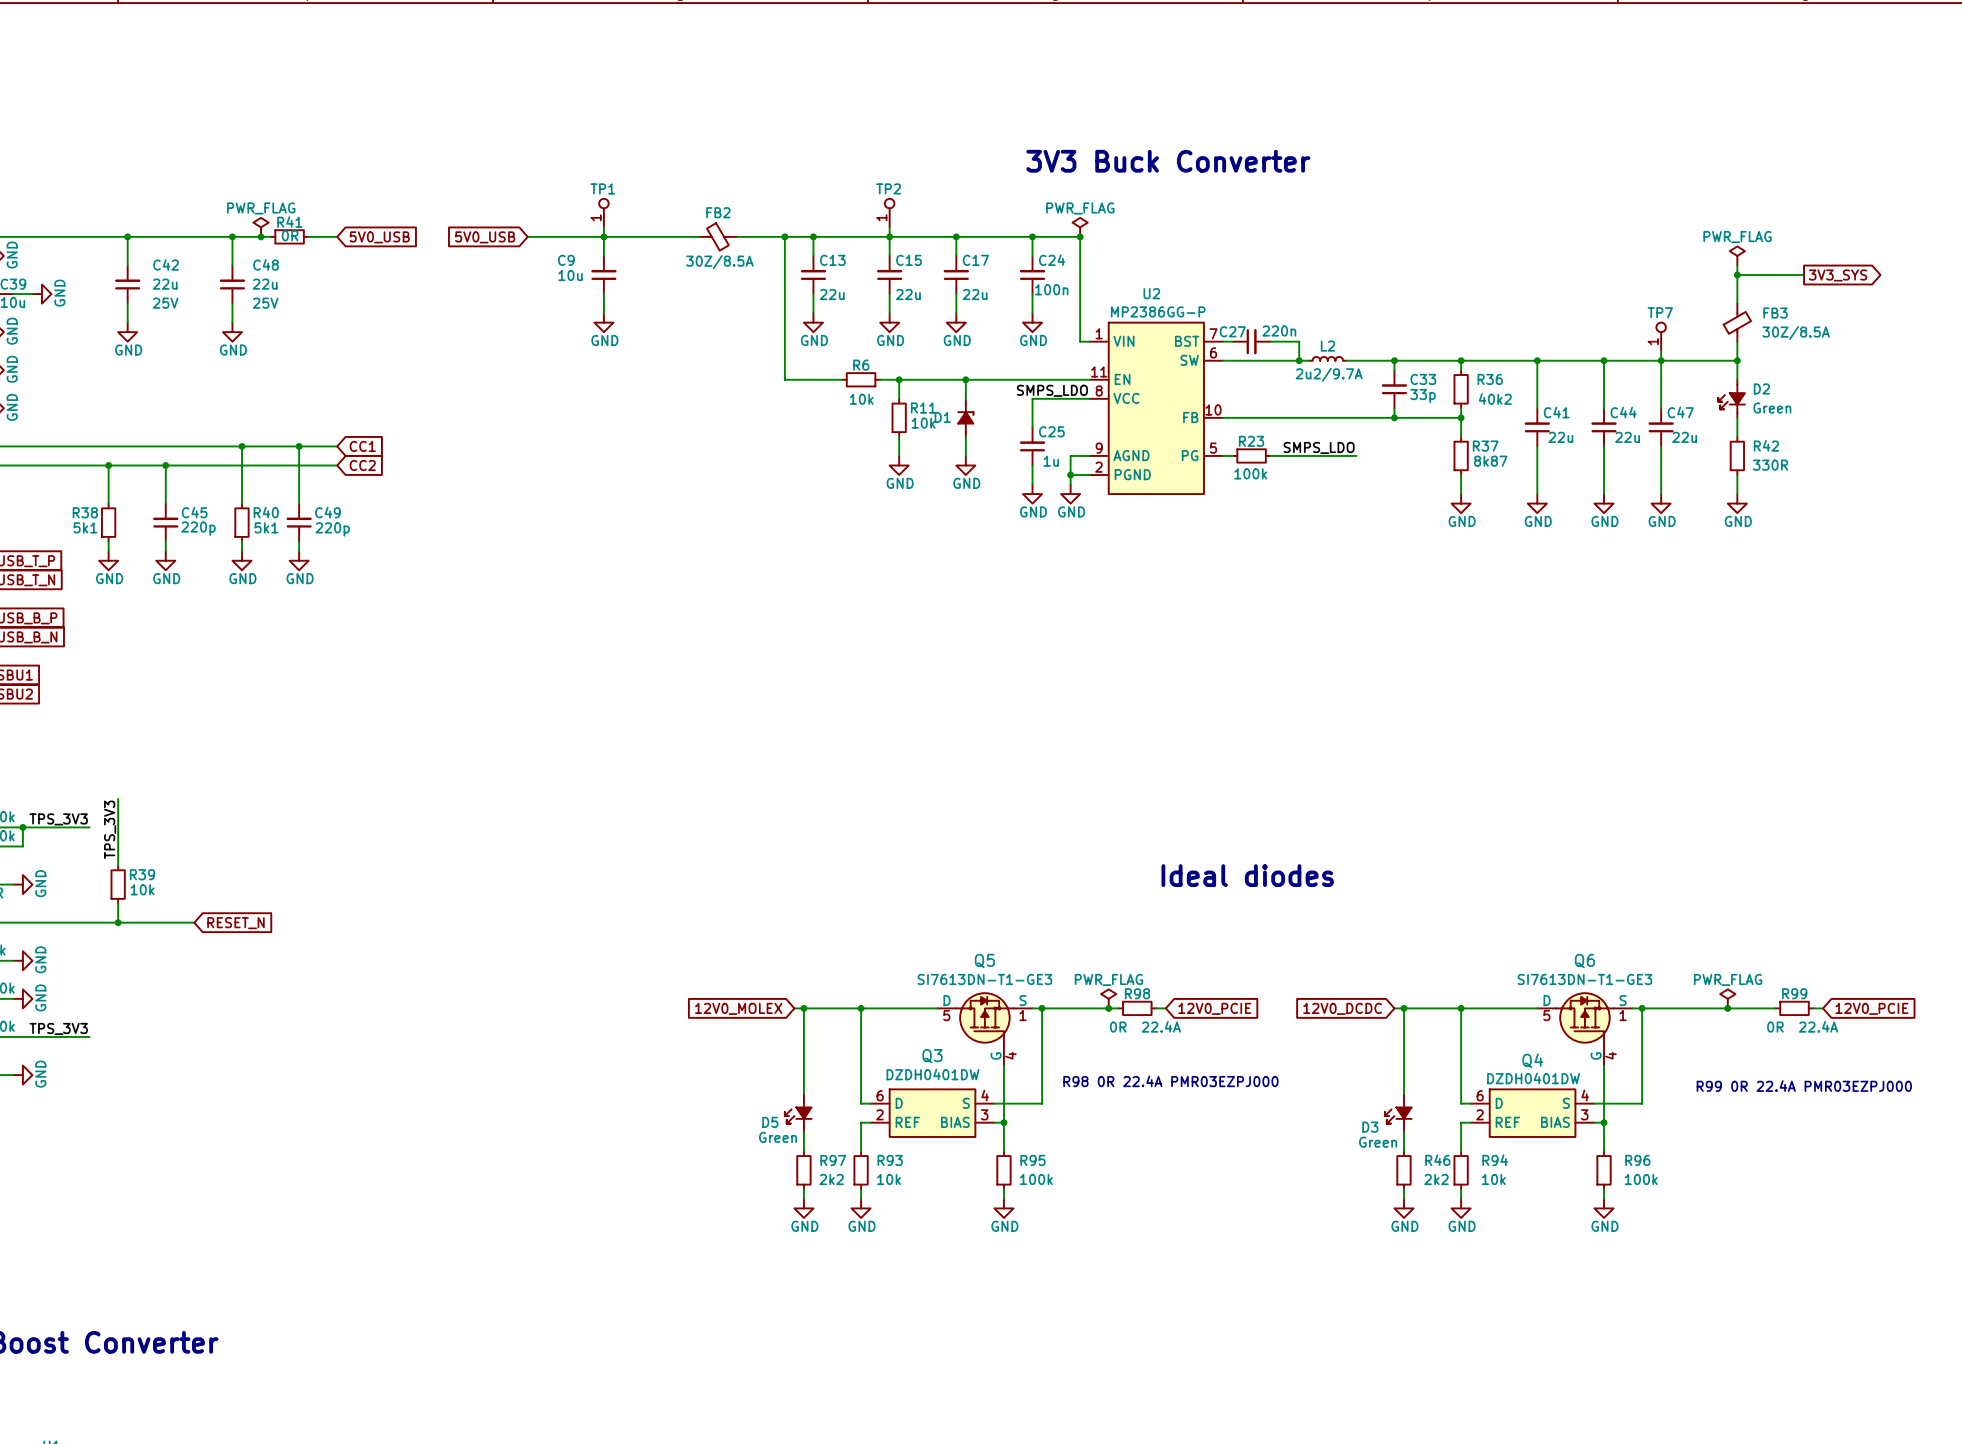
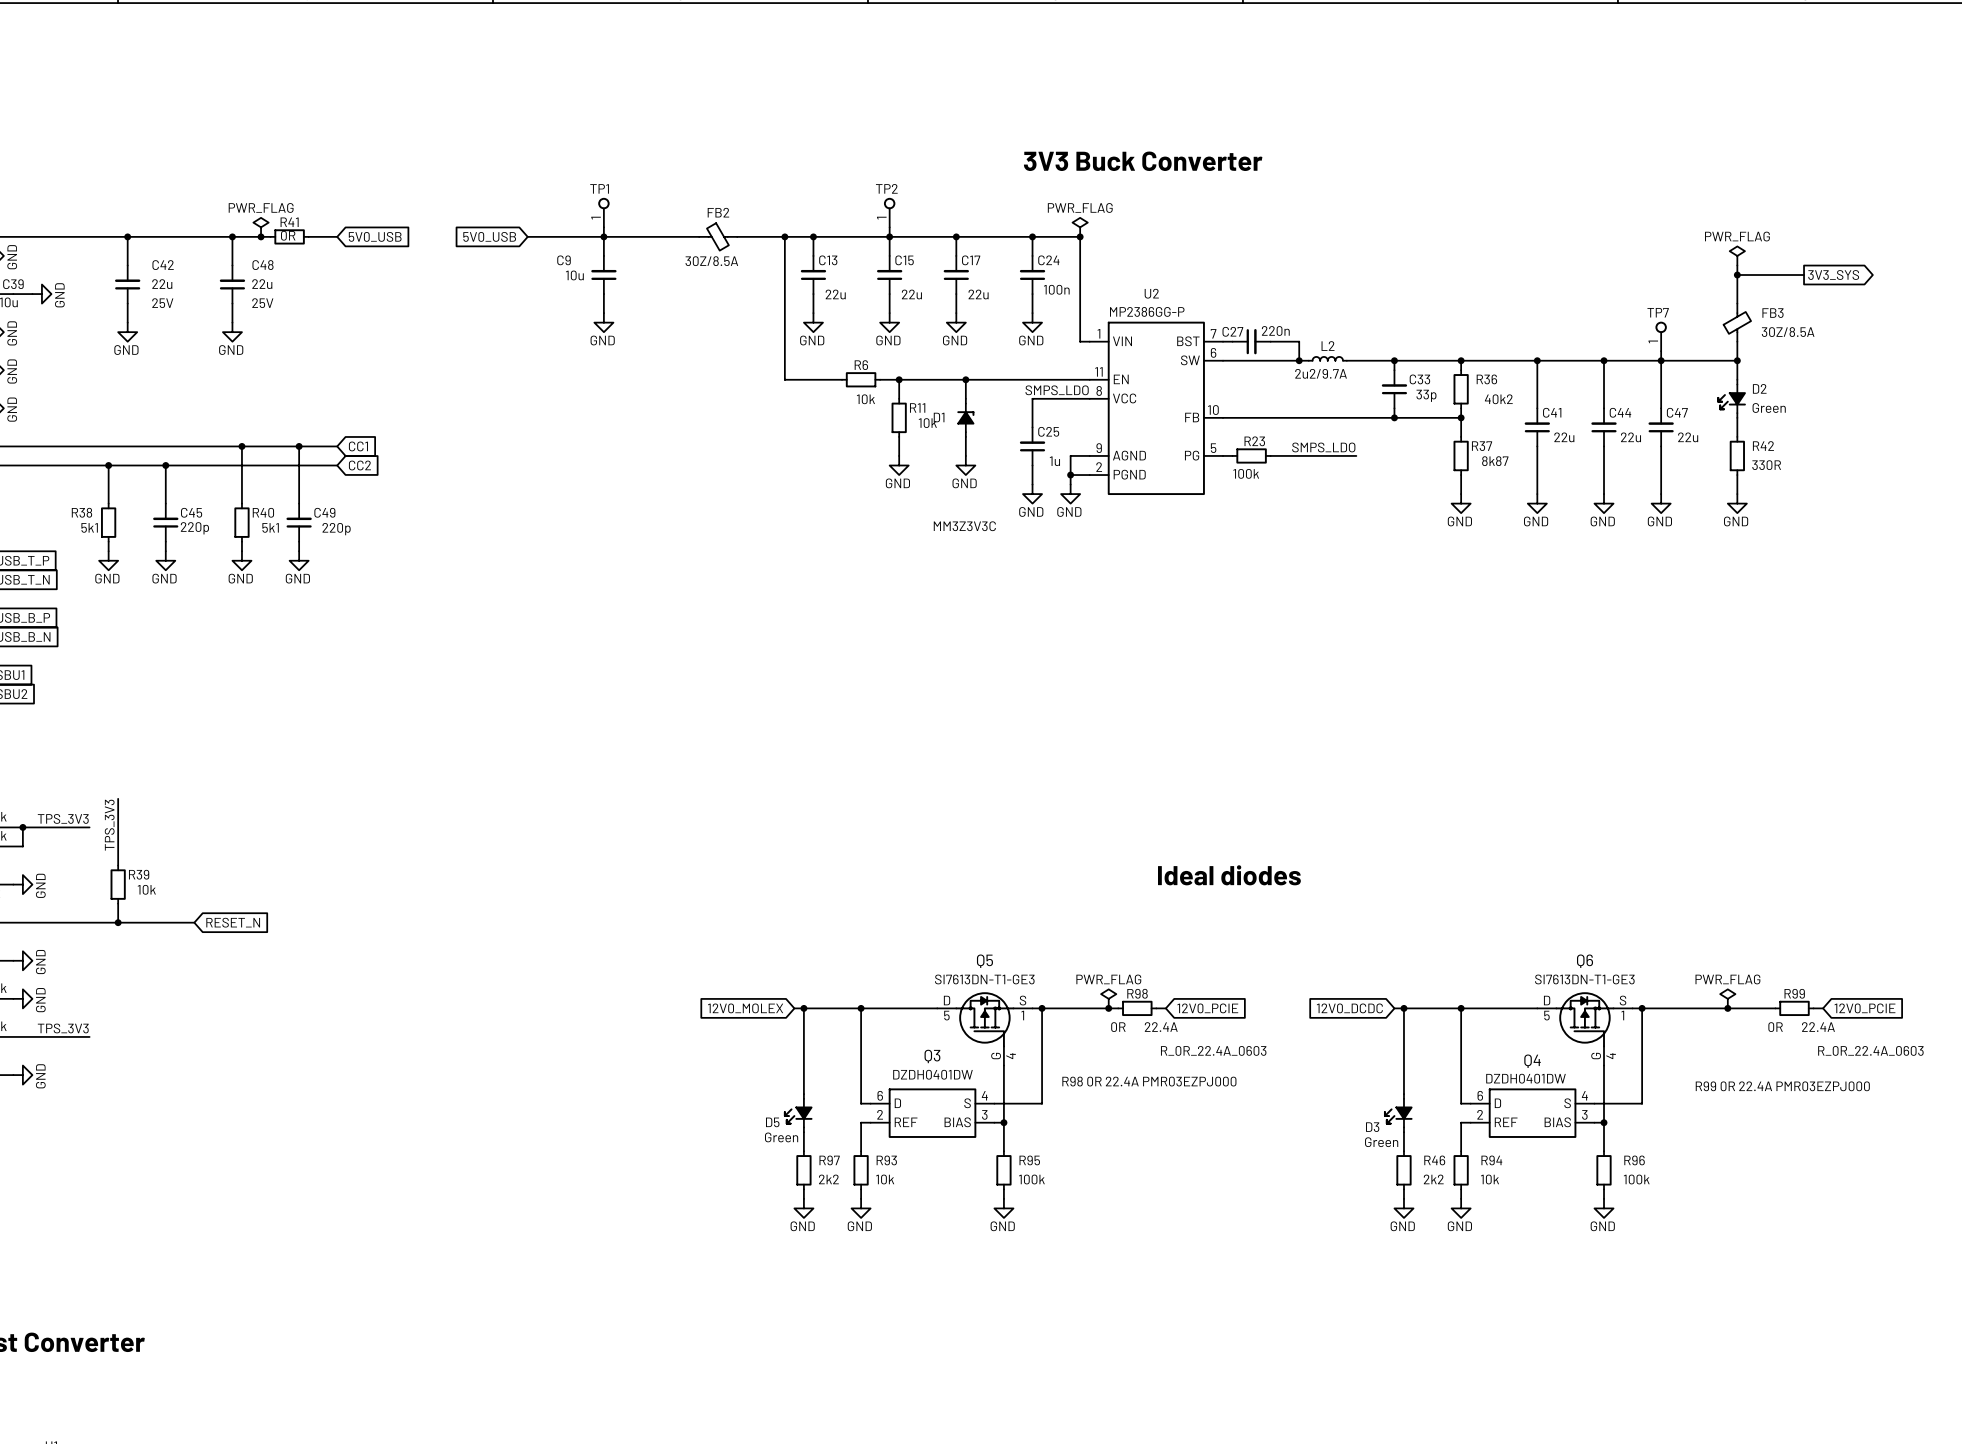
D1 text: none -> MM3Z3V3C (964, 526)
R98 value: none -> R_0R_22.4A_0603 (1213, 1050)
R99 value: none -> R_0R_22.4A_0603 (1870, 1050)

